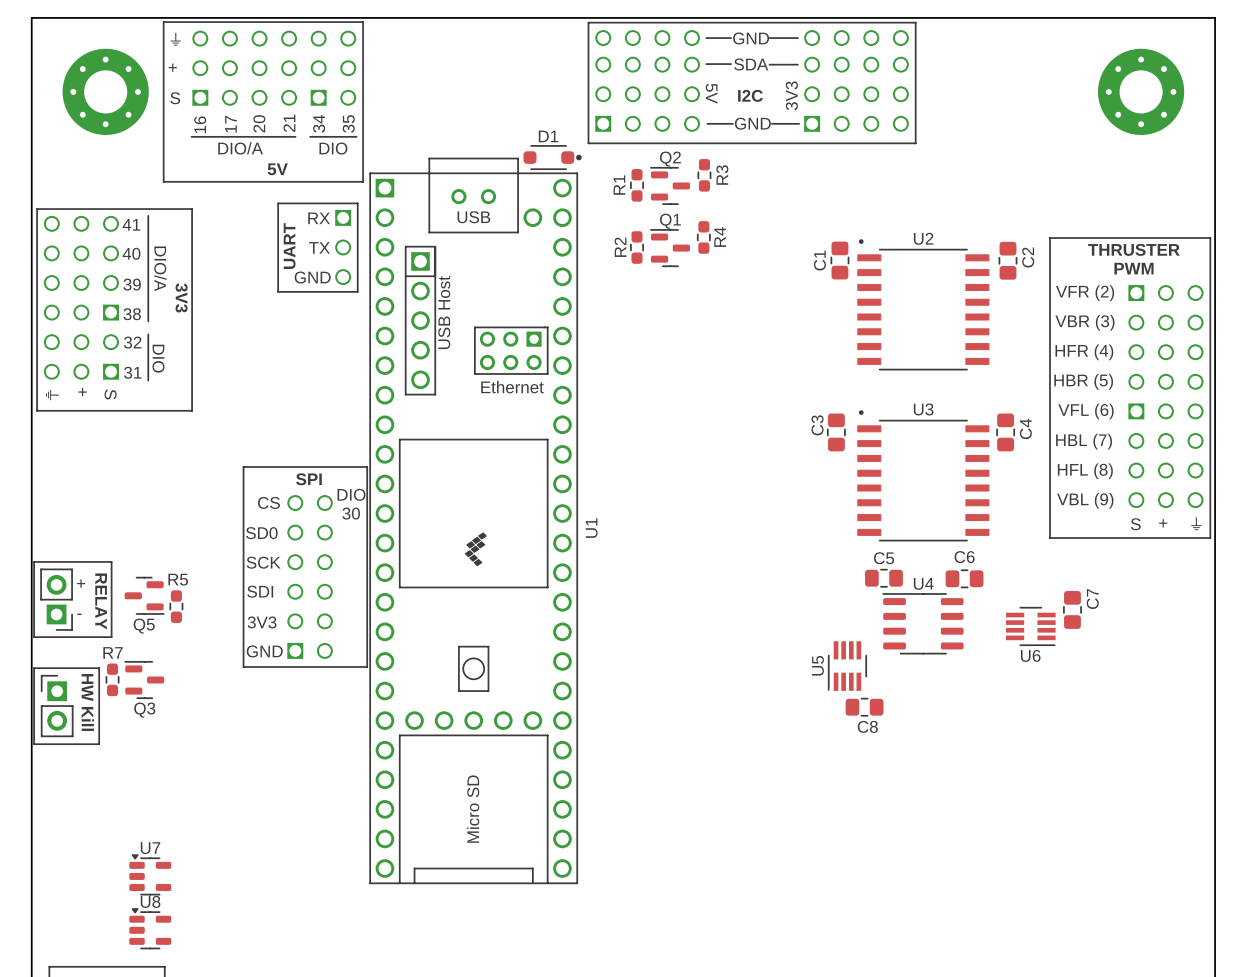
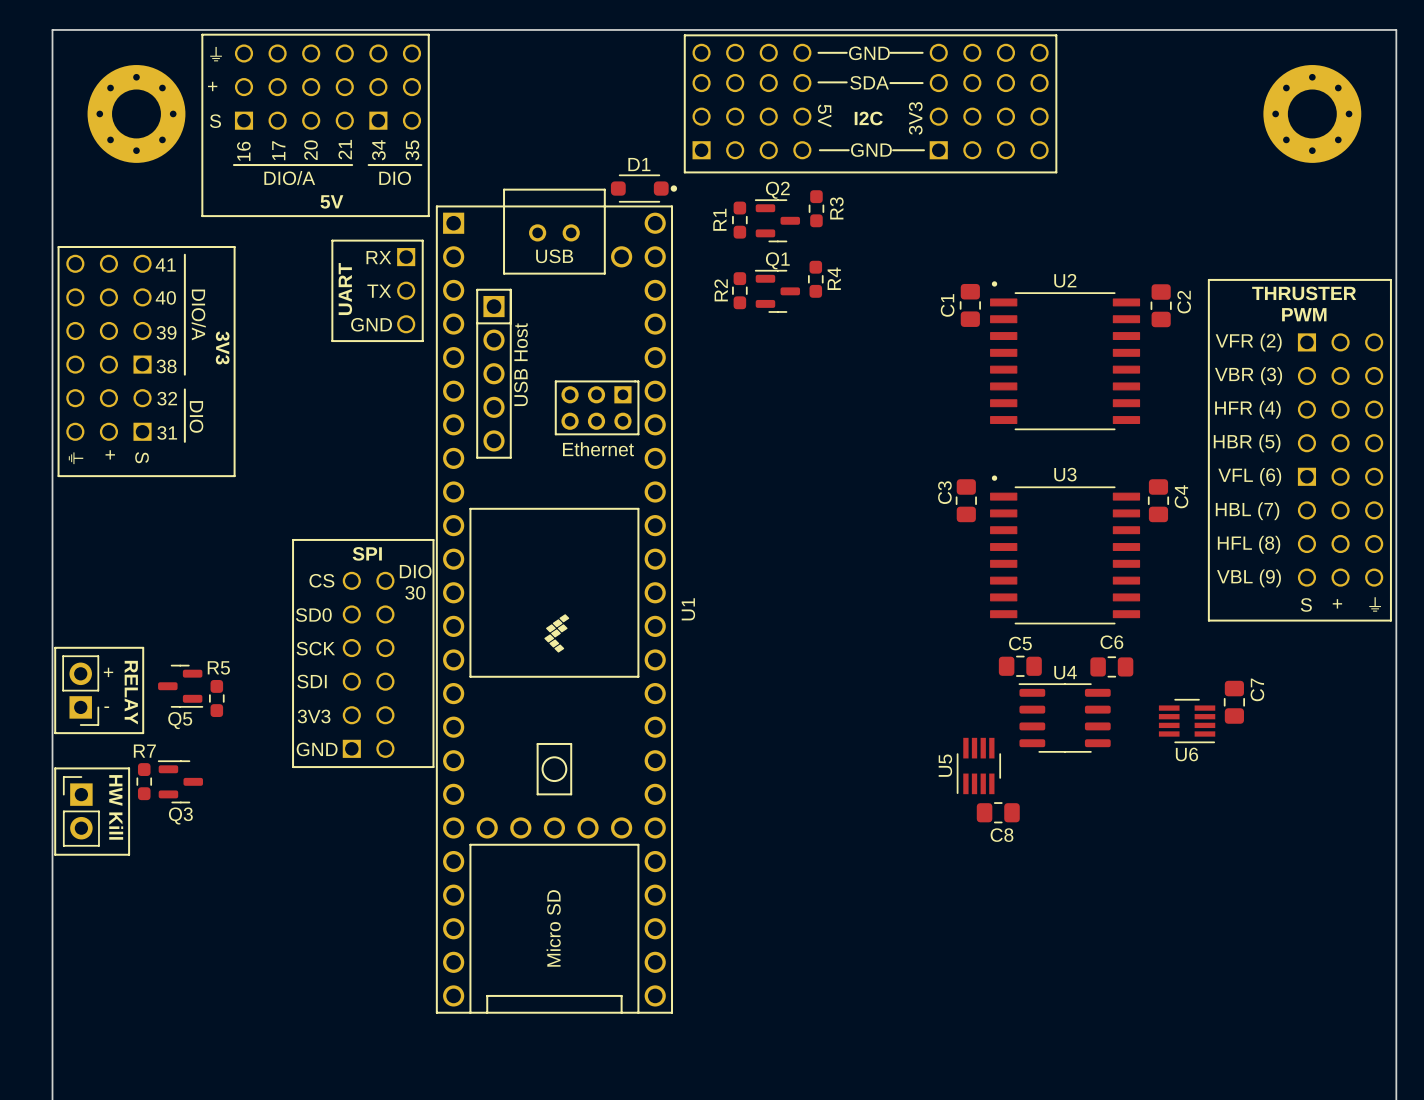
U7: (150, 874) -> none
U8: (150, 928) -> none

